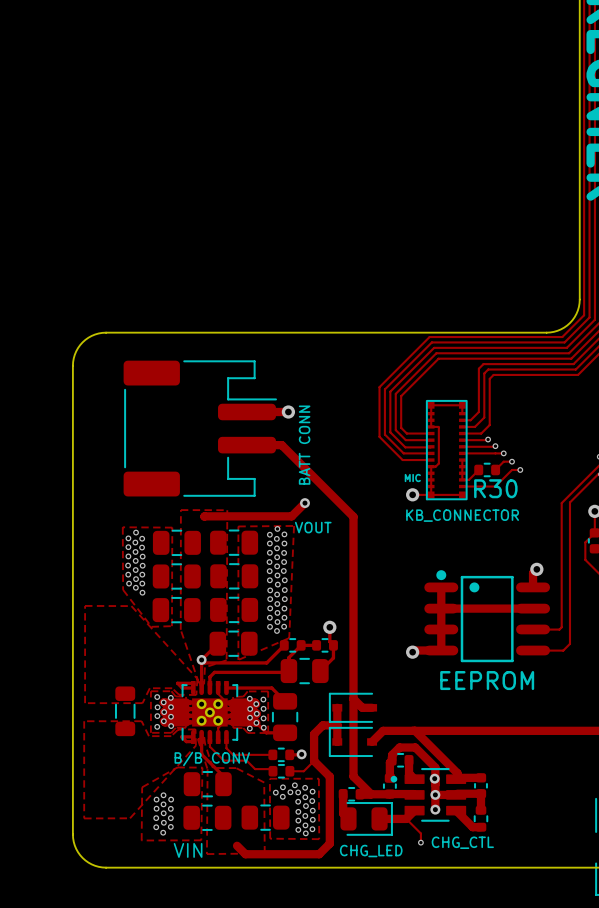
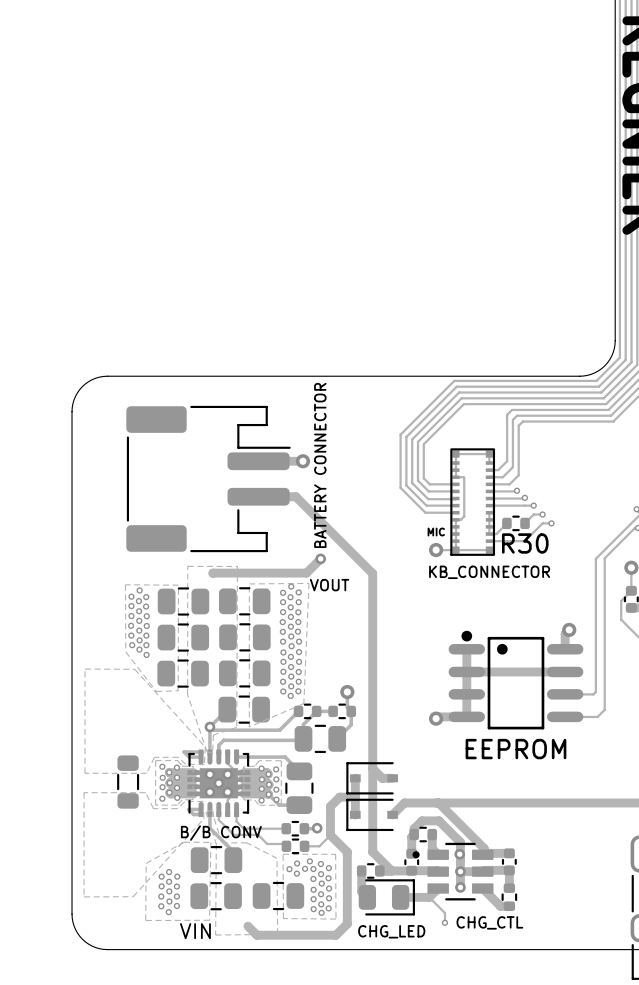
text: BATT CONN (304, 445) -> BATTERY CONNECTOR (320, 465)

